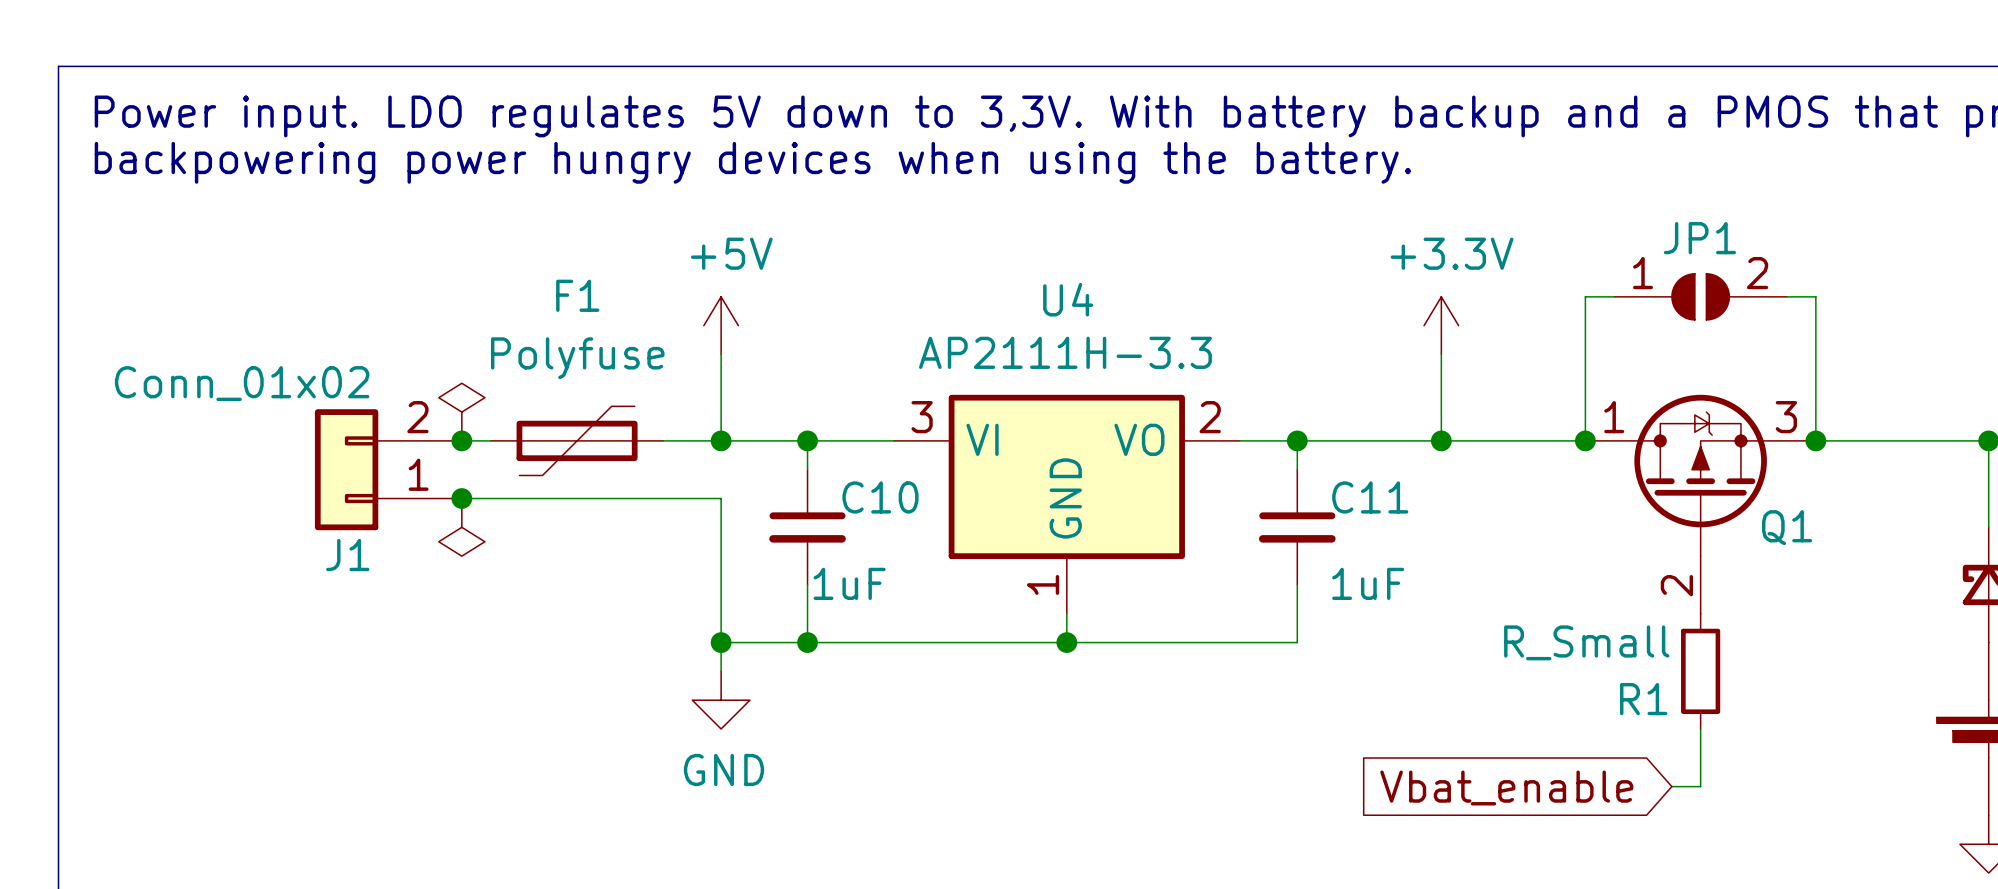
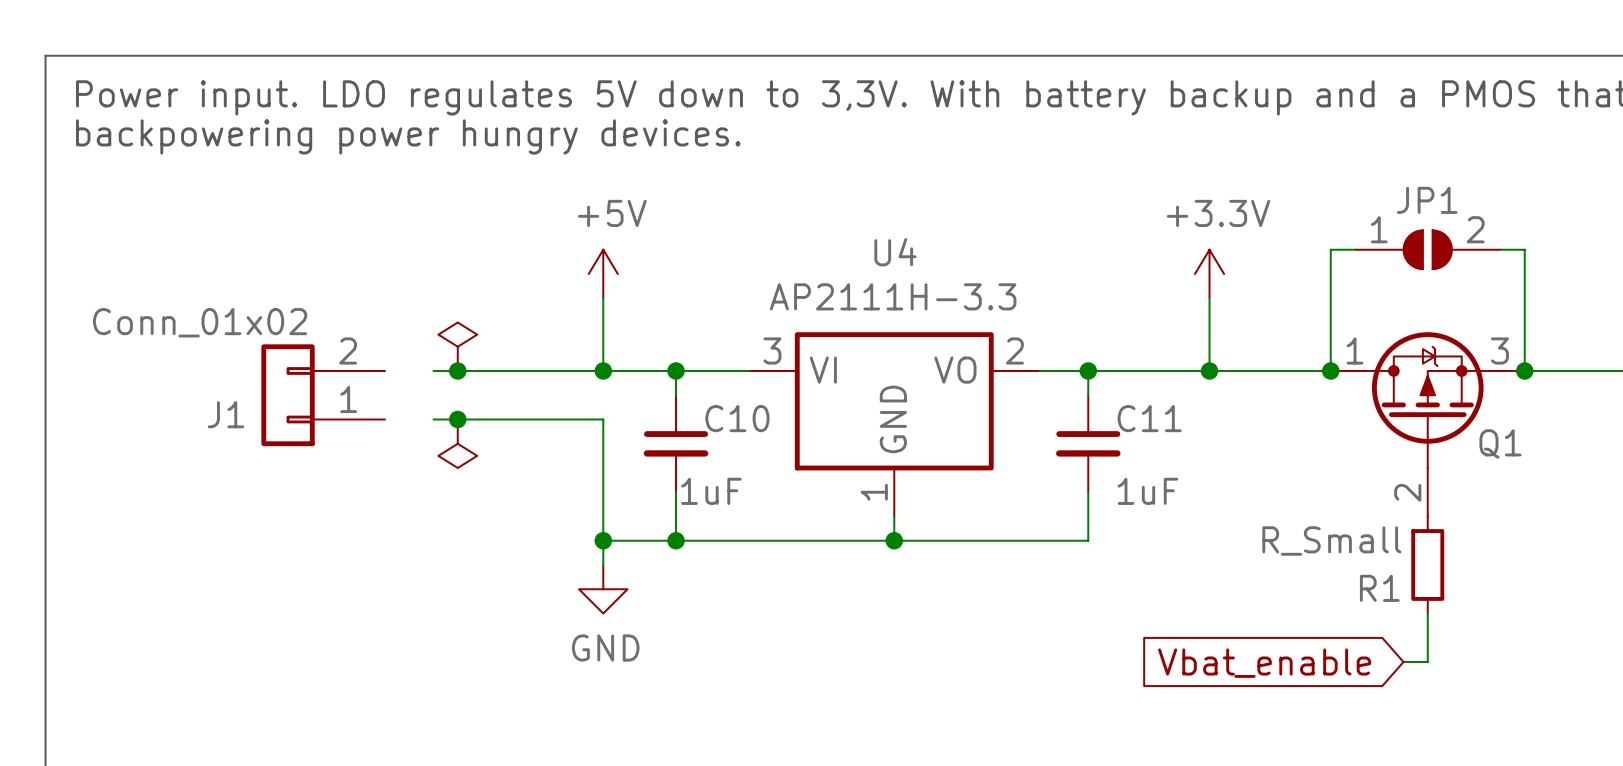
text: backpowering power hungry devices when using the battery. (752, 162) -> backpowering power hungry devices. (408, 136)
power symbol: (461, 412) -> none
power symbol: none -> (457, 346)
wire: (461, 440) (490, 440) -> none
junction: (461, 440) -> none
junction: none -> (457, 370)
F1: Polyfuse (577, 440) -> none
wire: (461, 498) (519, 498) -> none
junction: (461, 498) -> none
junction: none -> (457, 419)
power symbol: (461, 527) -> none
power symbol: none -> (457, 443)
J1 name position: J1 (347, 555) -> J1 (225, 414)

